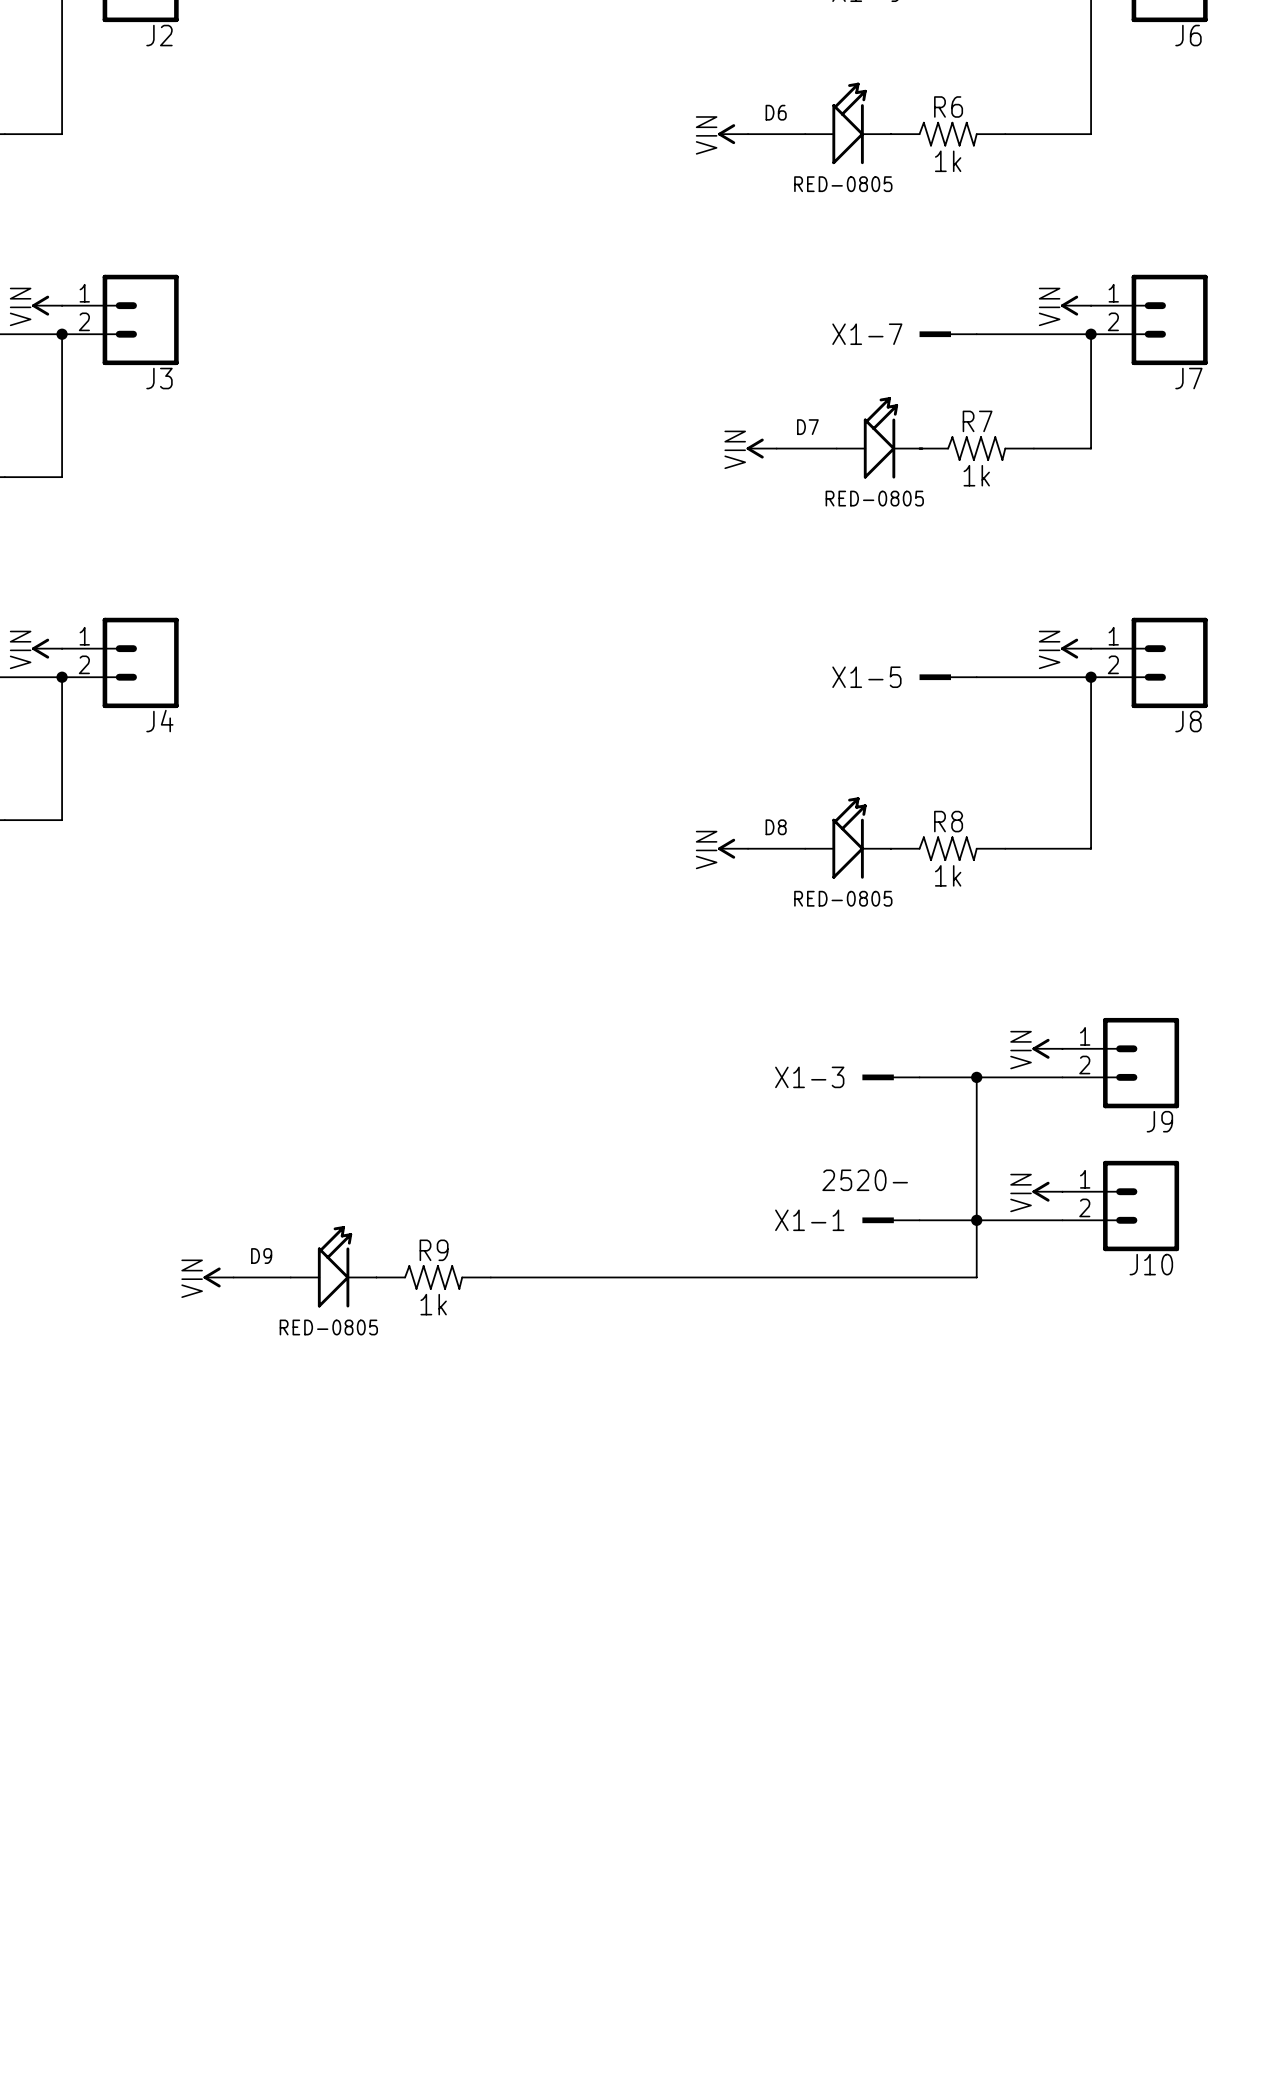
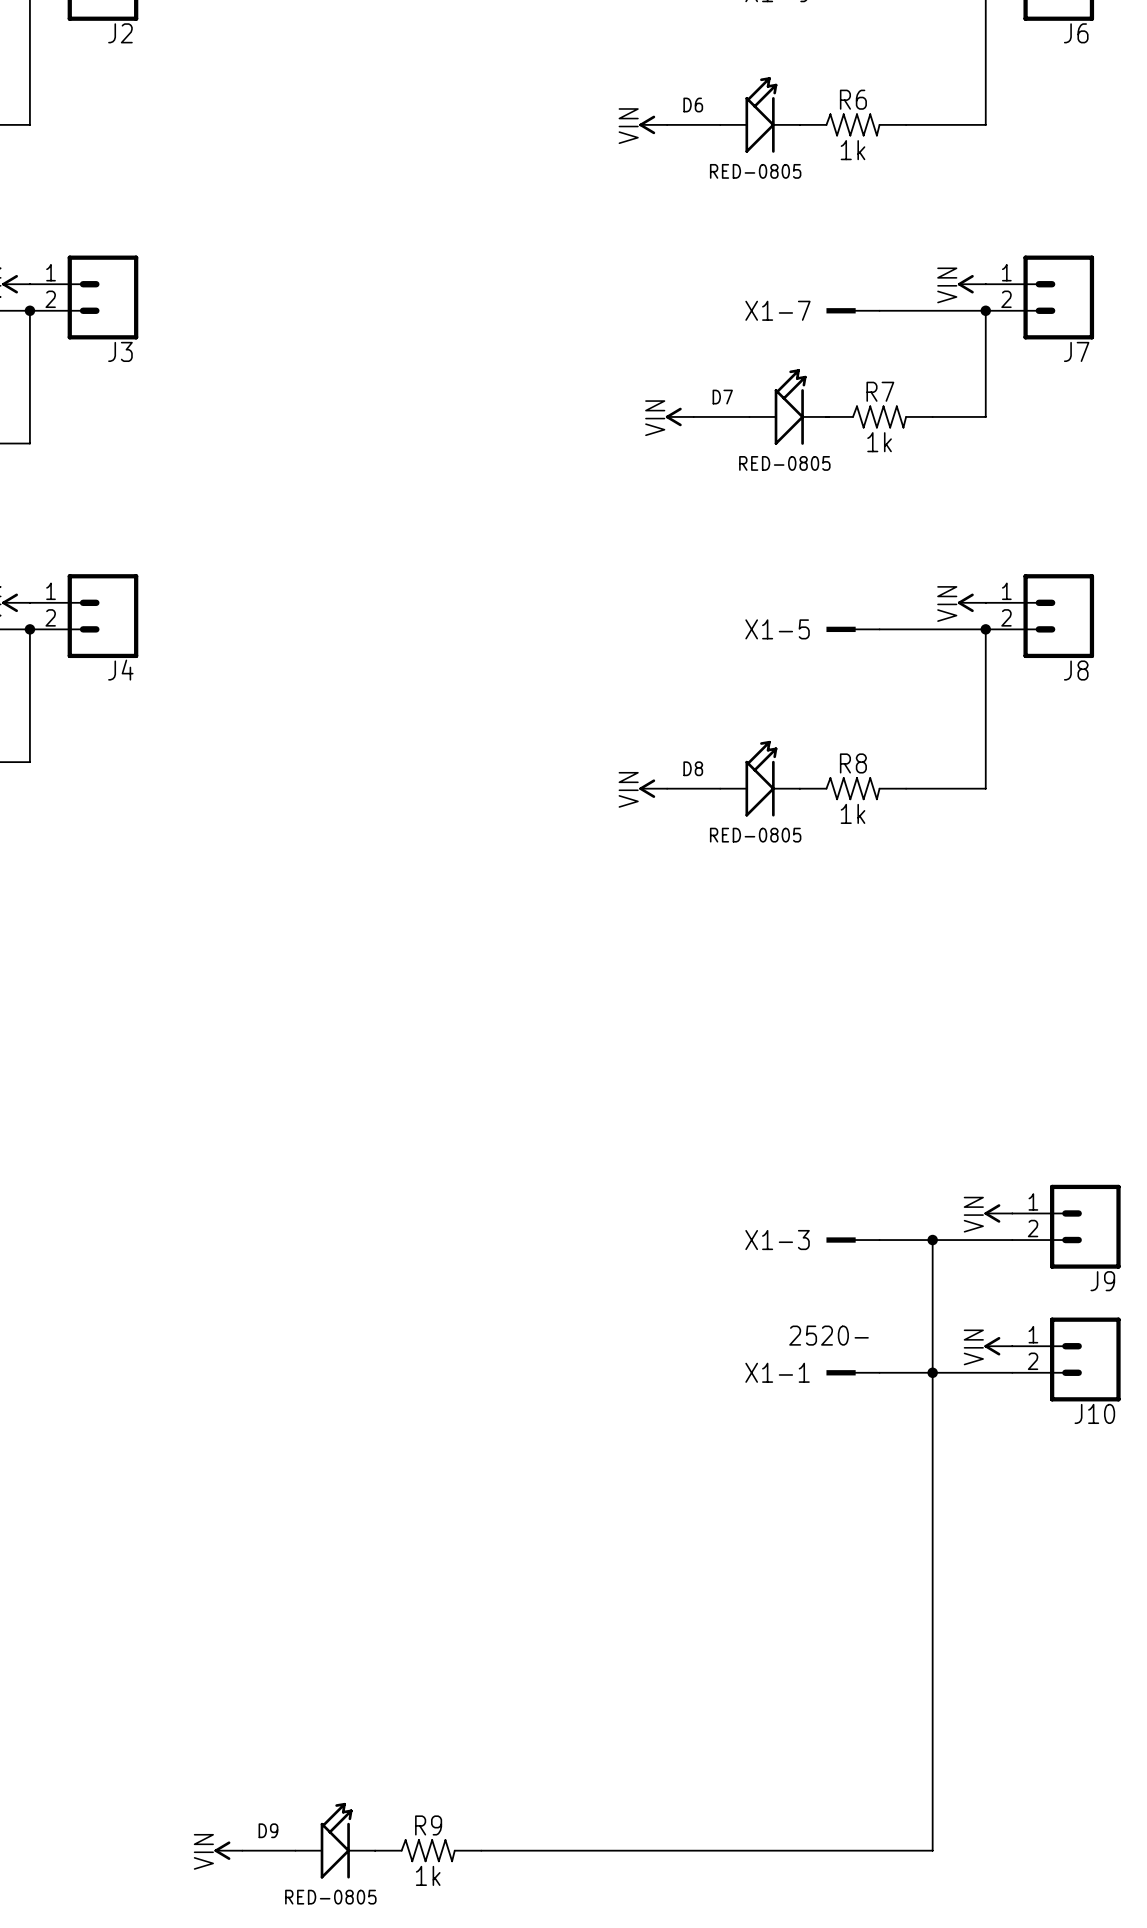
power symbol: VIN (1047, 1048) -> none
J9 position: (1120, 1063) -> (1066, 1226)
X1-3 position: (890, 1077) -> (853, 1240)
wire: (919, 1077) (1062, 1077) -> (879, 1240) (1012, 1240)
wire: (976, 1077) (976, 1277) (490, 1277) -> none
junction: (976, 1077) -> none
power symbol position: VIN (1047, 1191) -> VIN (998, 1213)
J10 position: (1120, 1206) -> (1066, 1359)
X1-1 position: (890, 1220) -> (853, 1372)
wire: (919, 1220) (1062, 1220) -> (879, 1372) (1012, 1372)
junction: (976, 1220) -> none
D9 position: (333, 1266) -> (335, 1840)
power symbol: VIN (218, 1277) -> none
wire: (233, 1277) (290, 1277) -> none
R9 position: (433, 1277) -> (428, 1850)
wire: none -> (932, 1240) (932, 1850) (481, 1850)
junction: none -> (932, 1240)
power symbol: none -> VIN (998, 1346)
junction: none -> (932, 1372)
power symbol: none -> VIN (228, 1850)
wire: none -> (242, 1850) (295, 1850)

